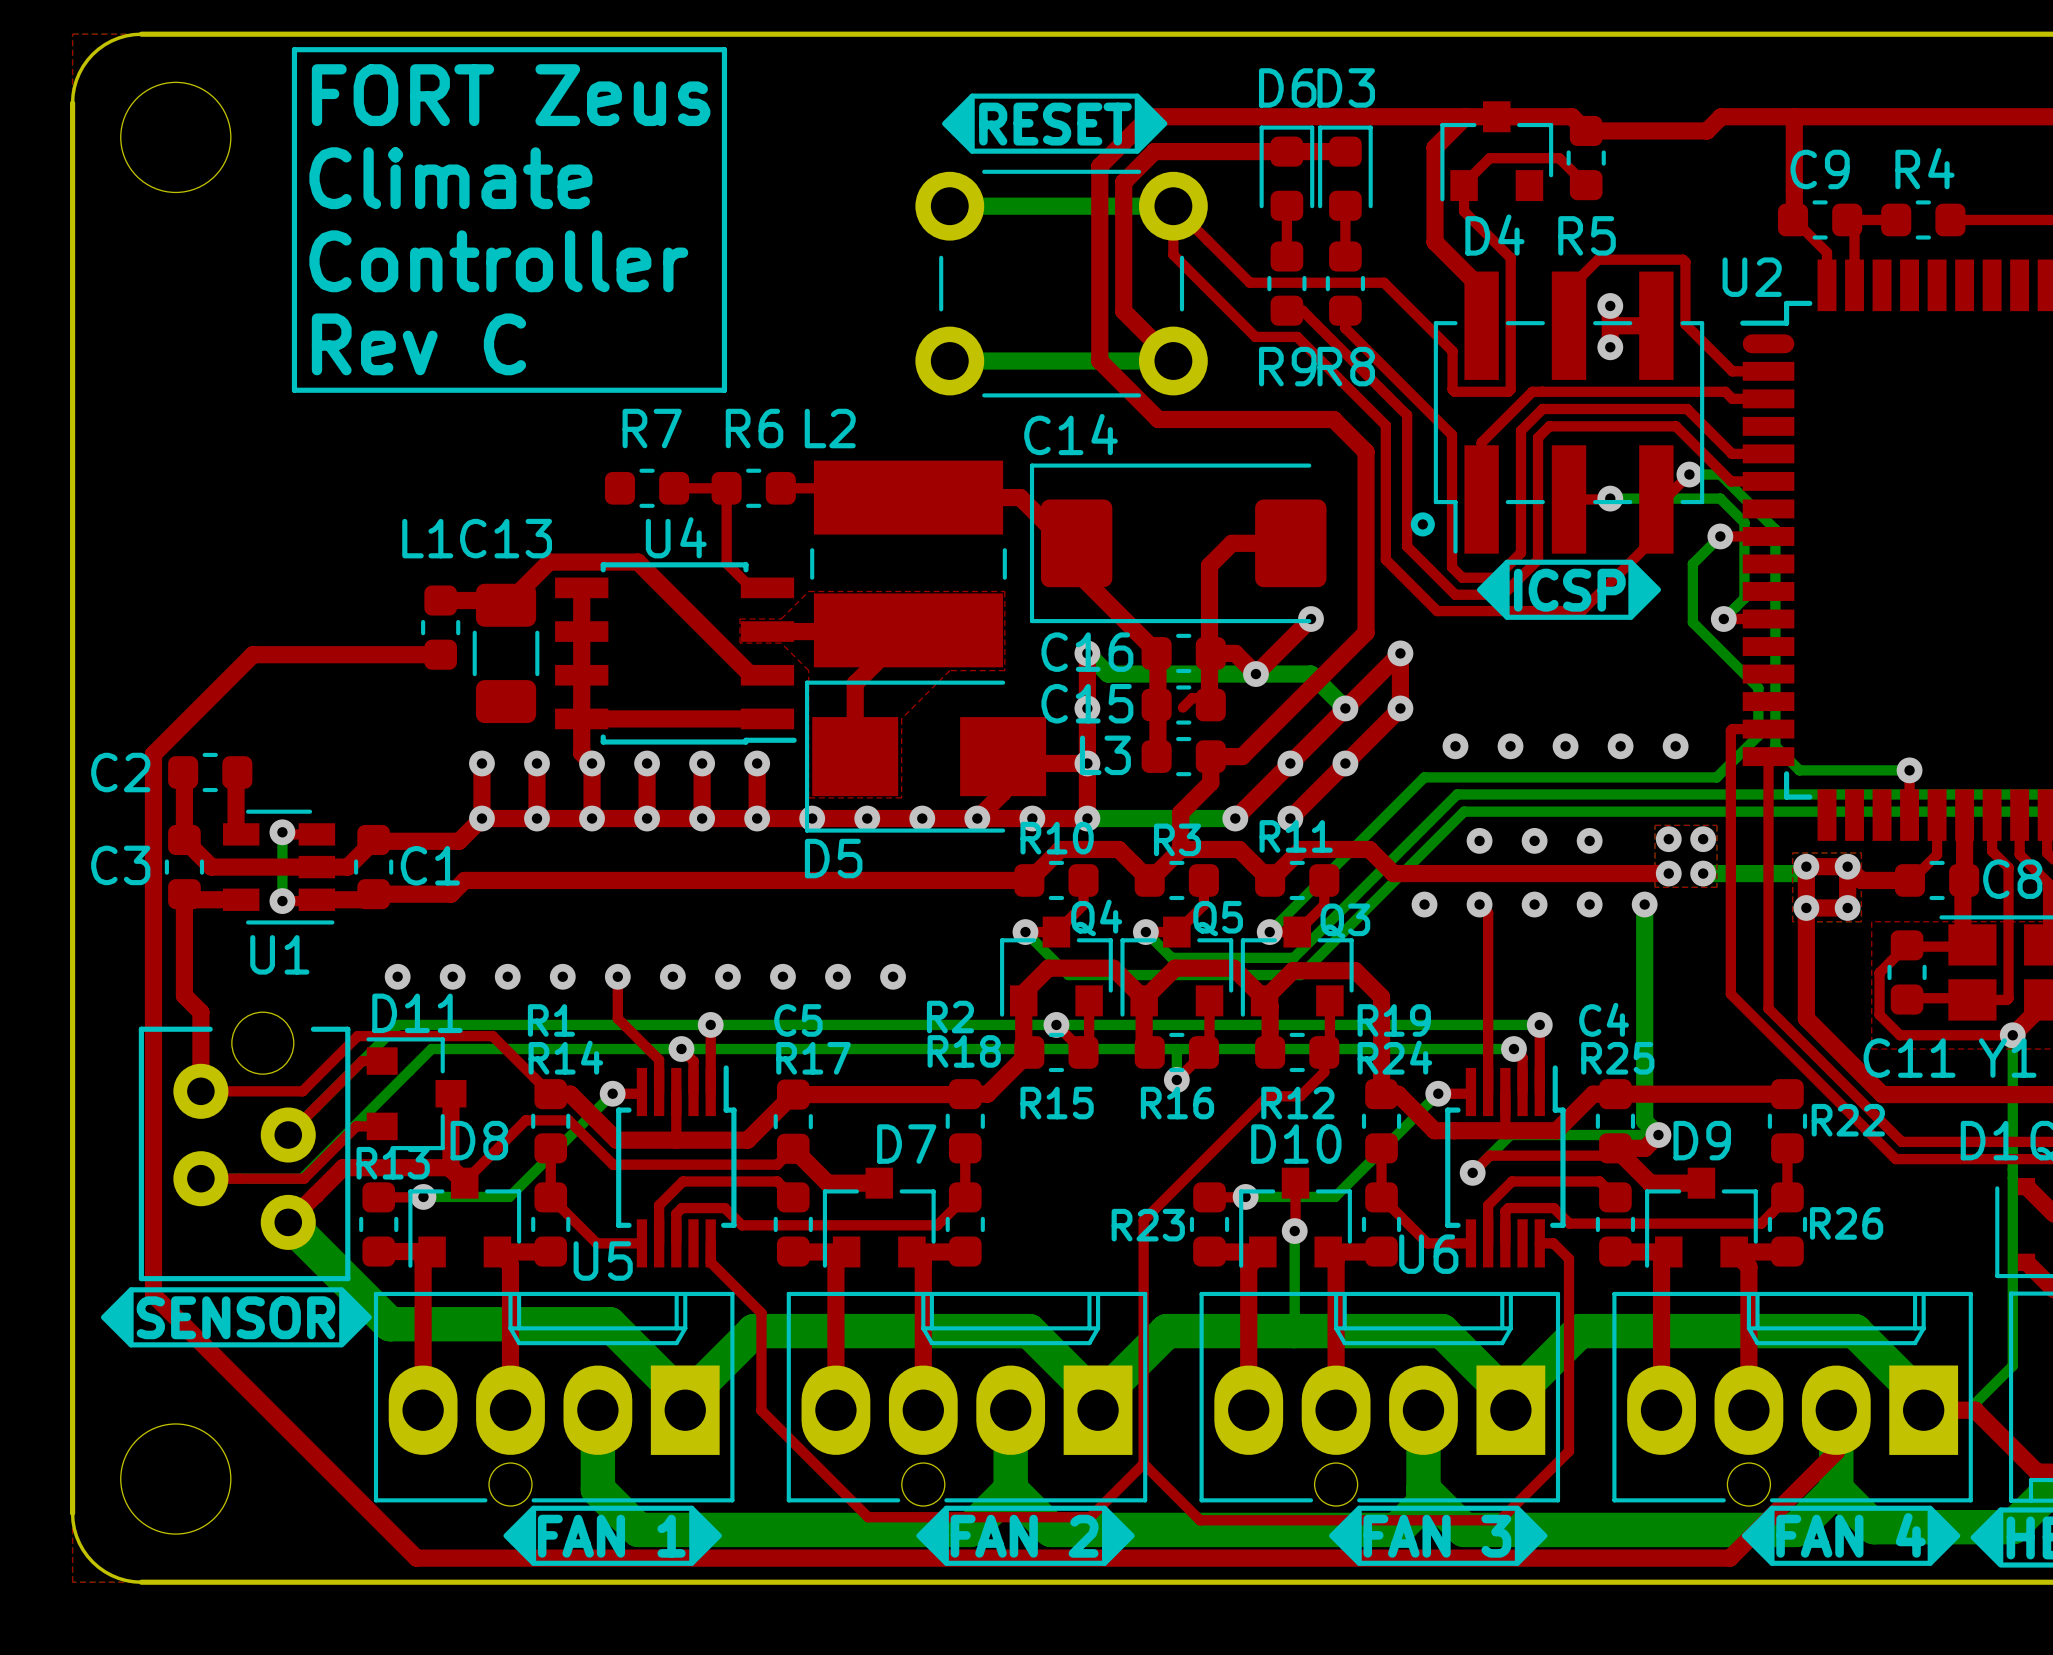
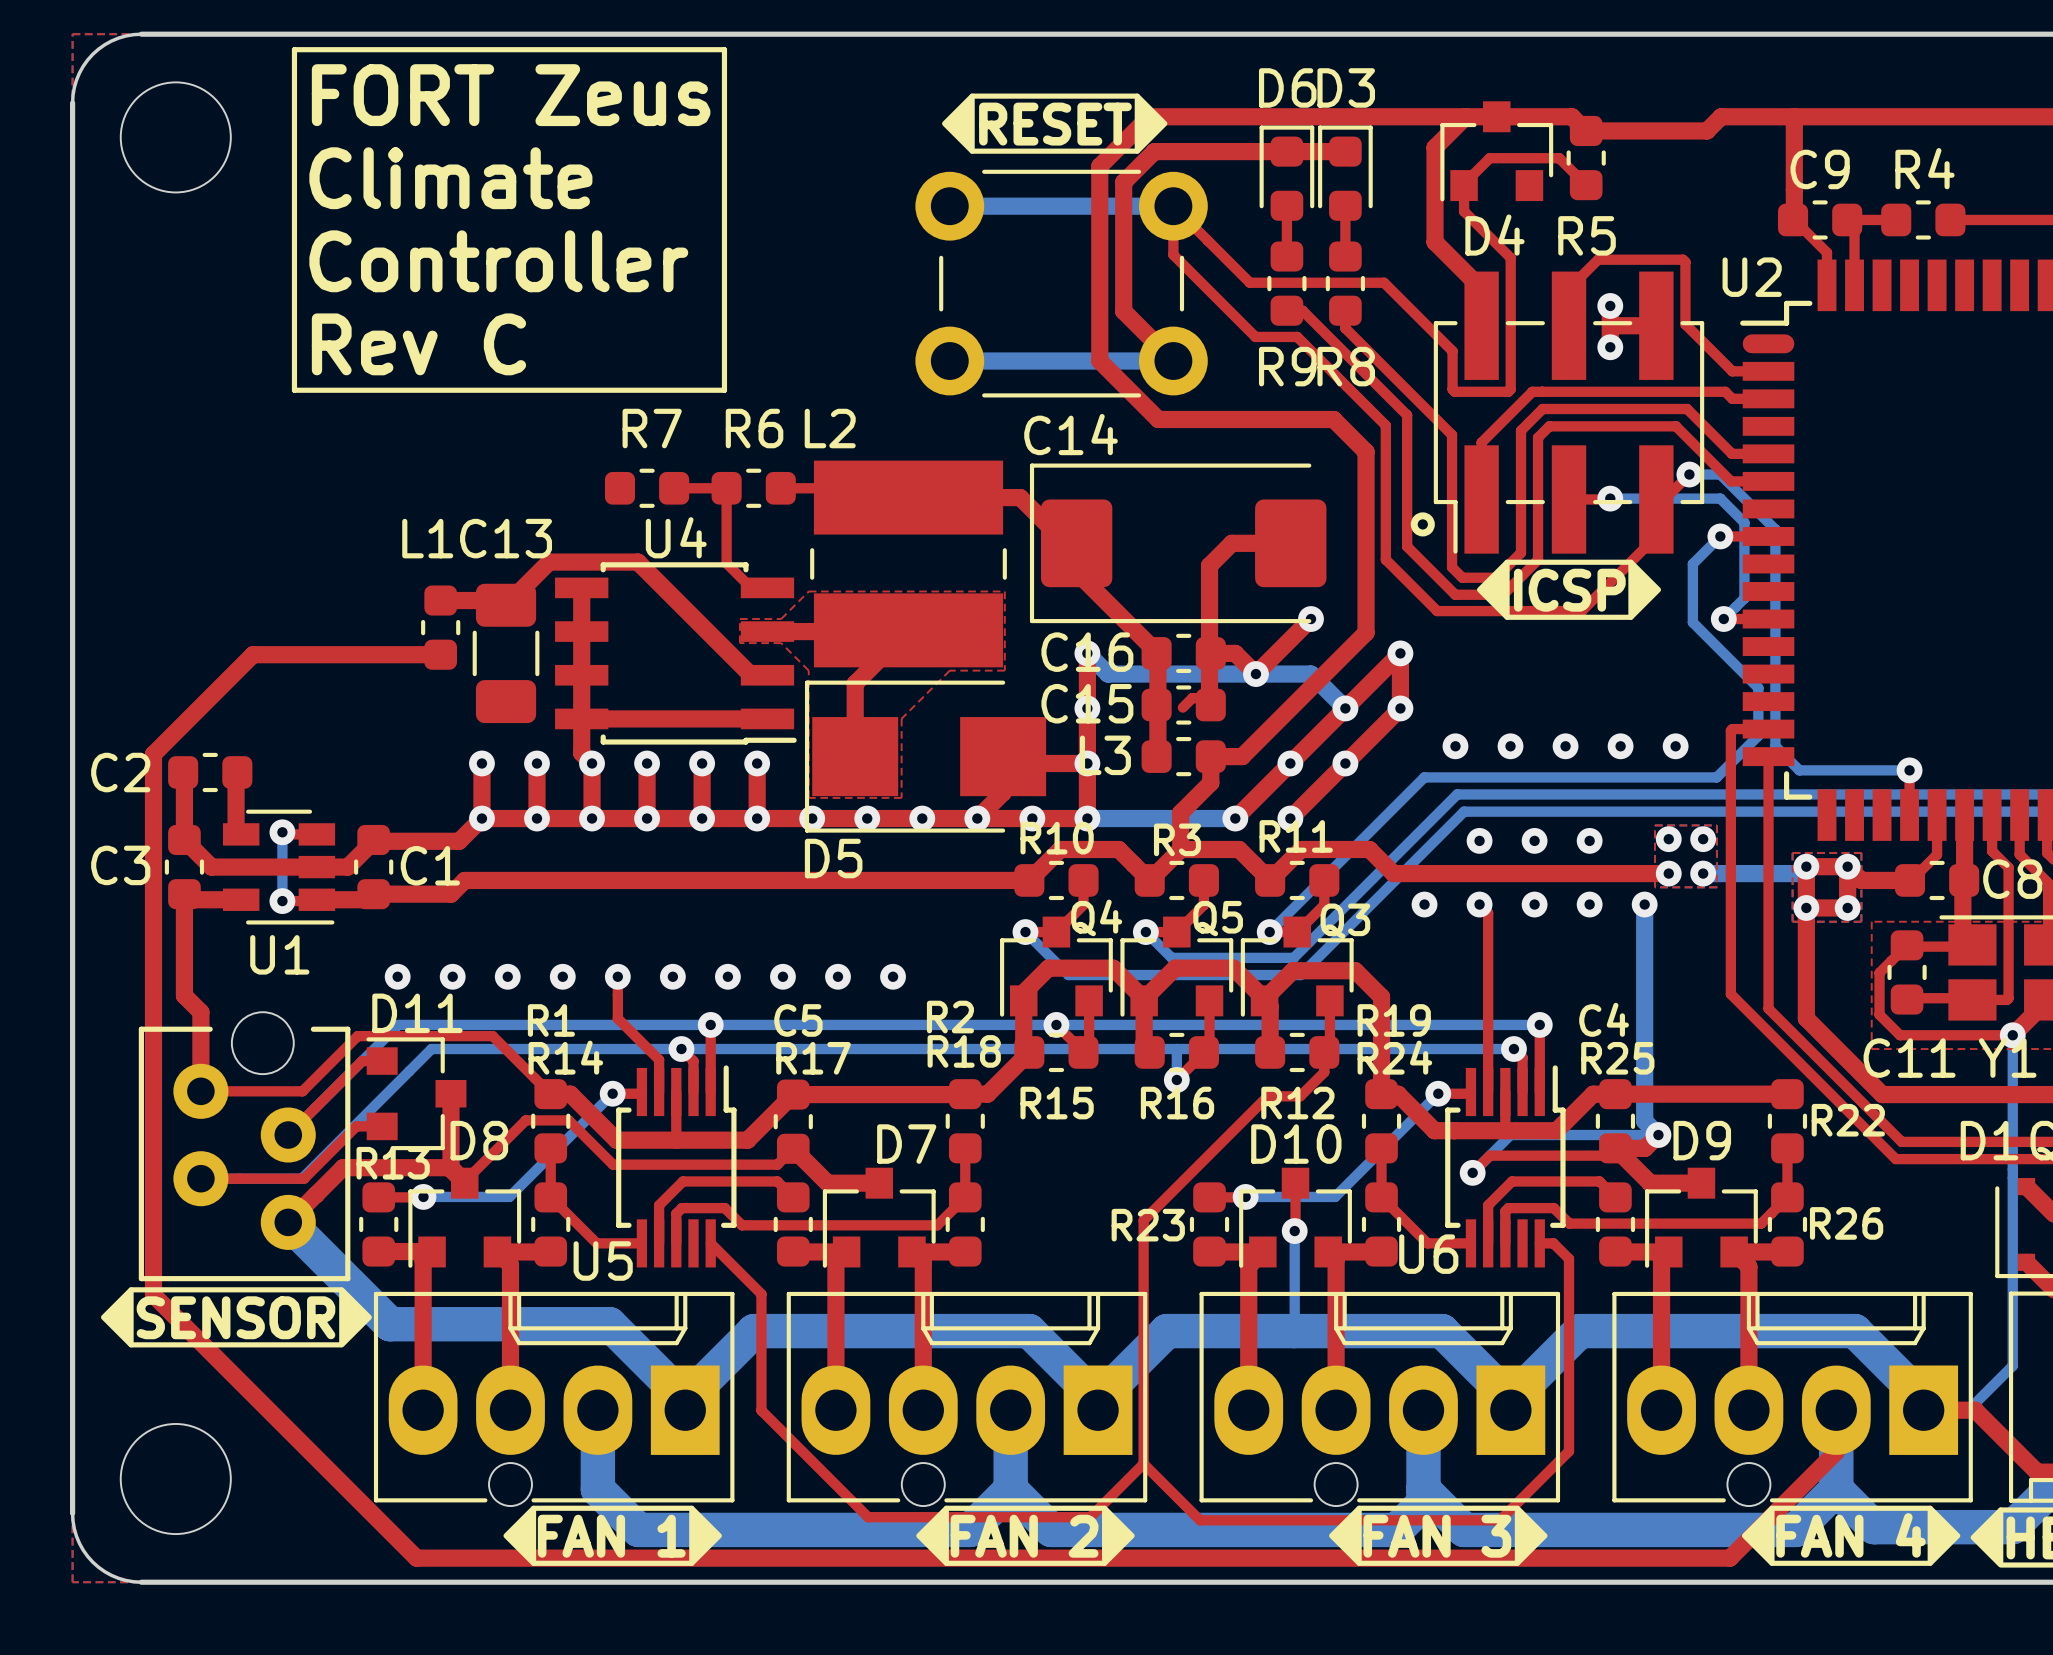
top track: (710, 1243) (710, 1262) (761, 1313) -> (710, 1243) (761, 1294) (761, 1313)

